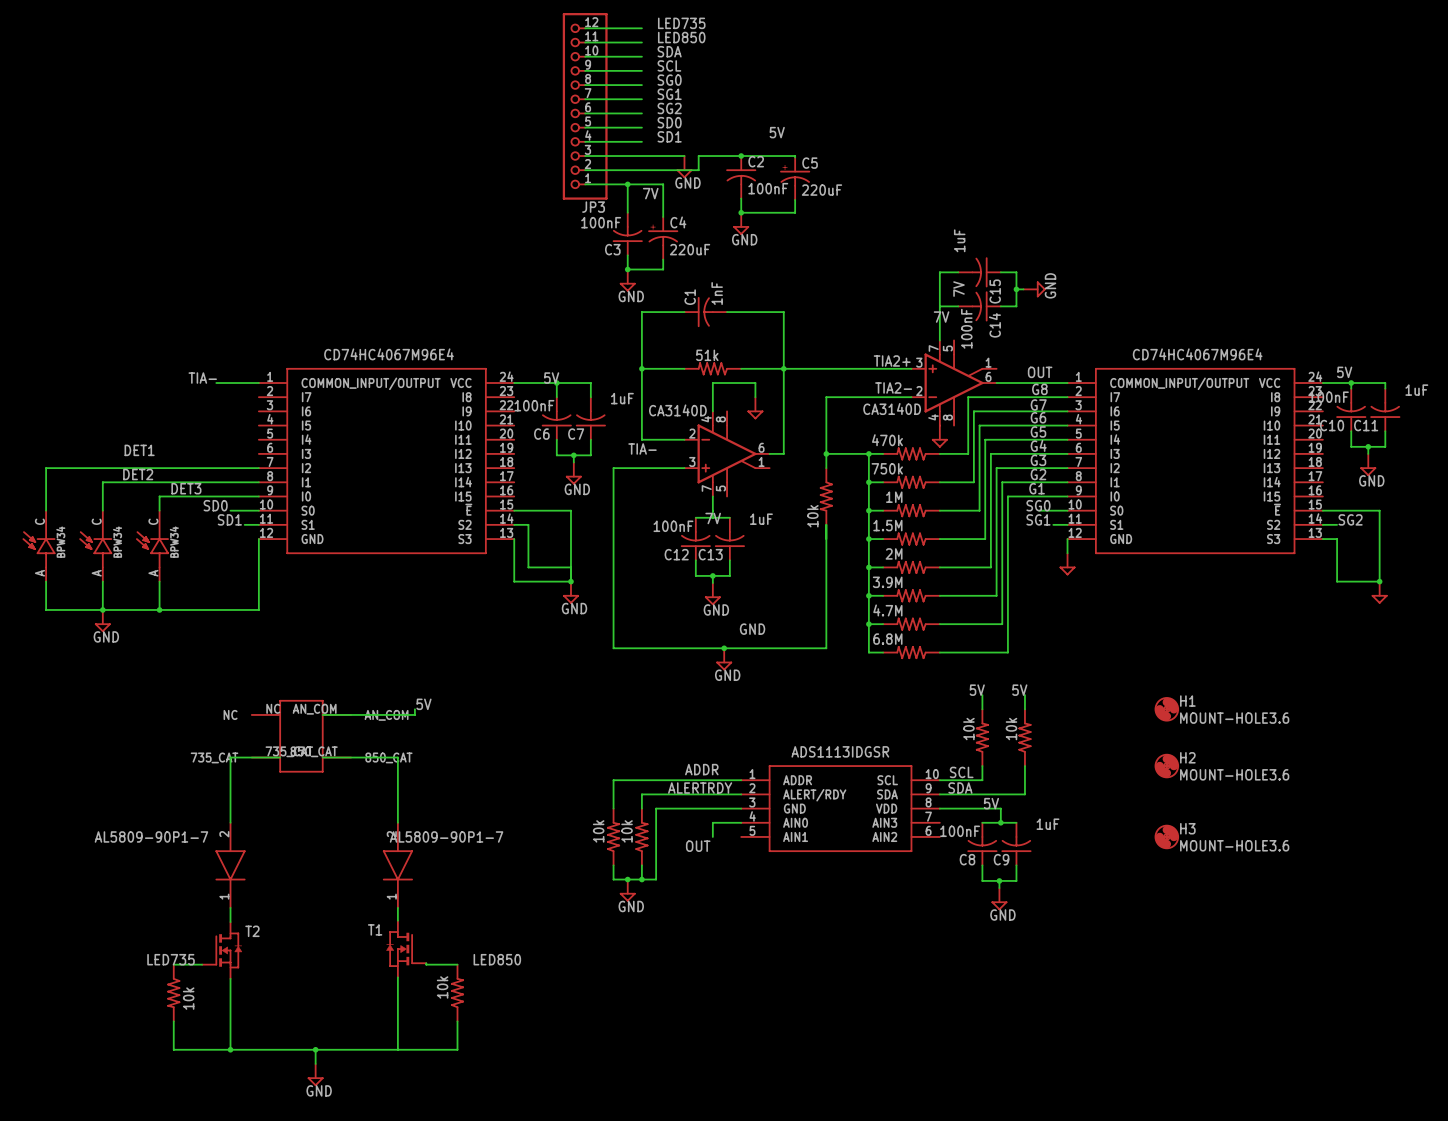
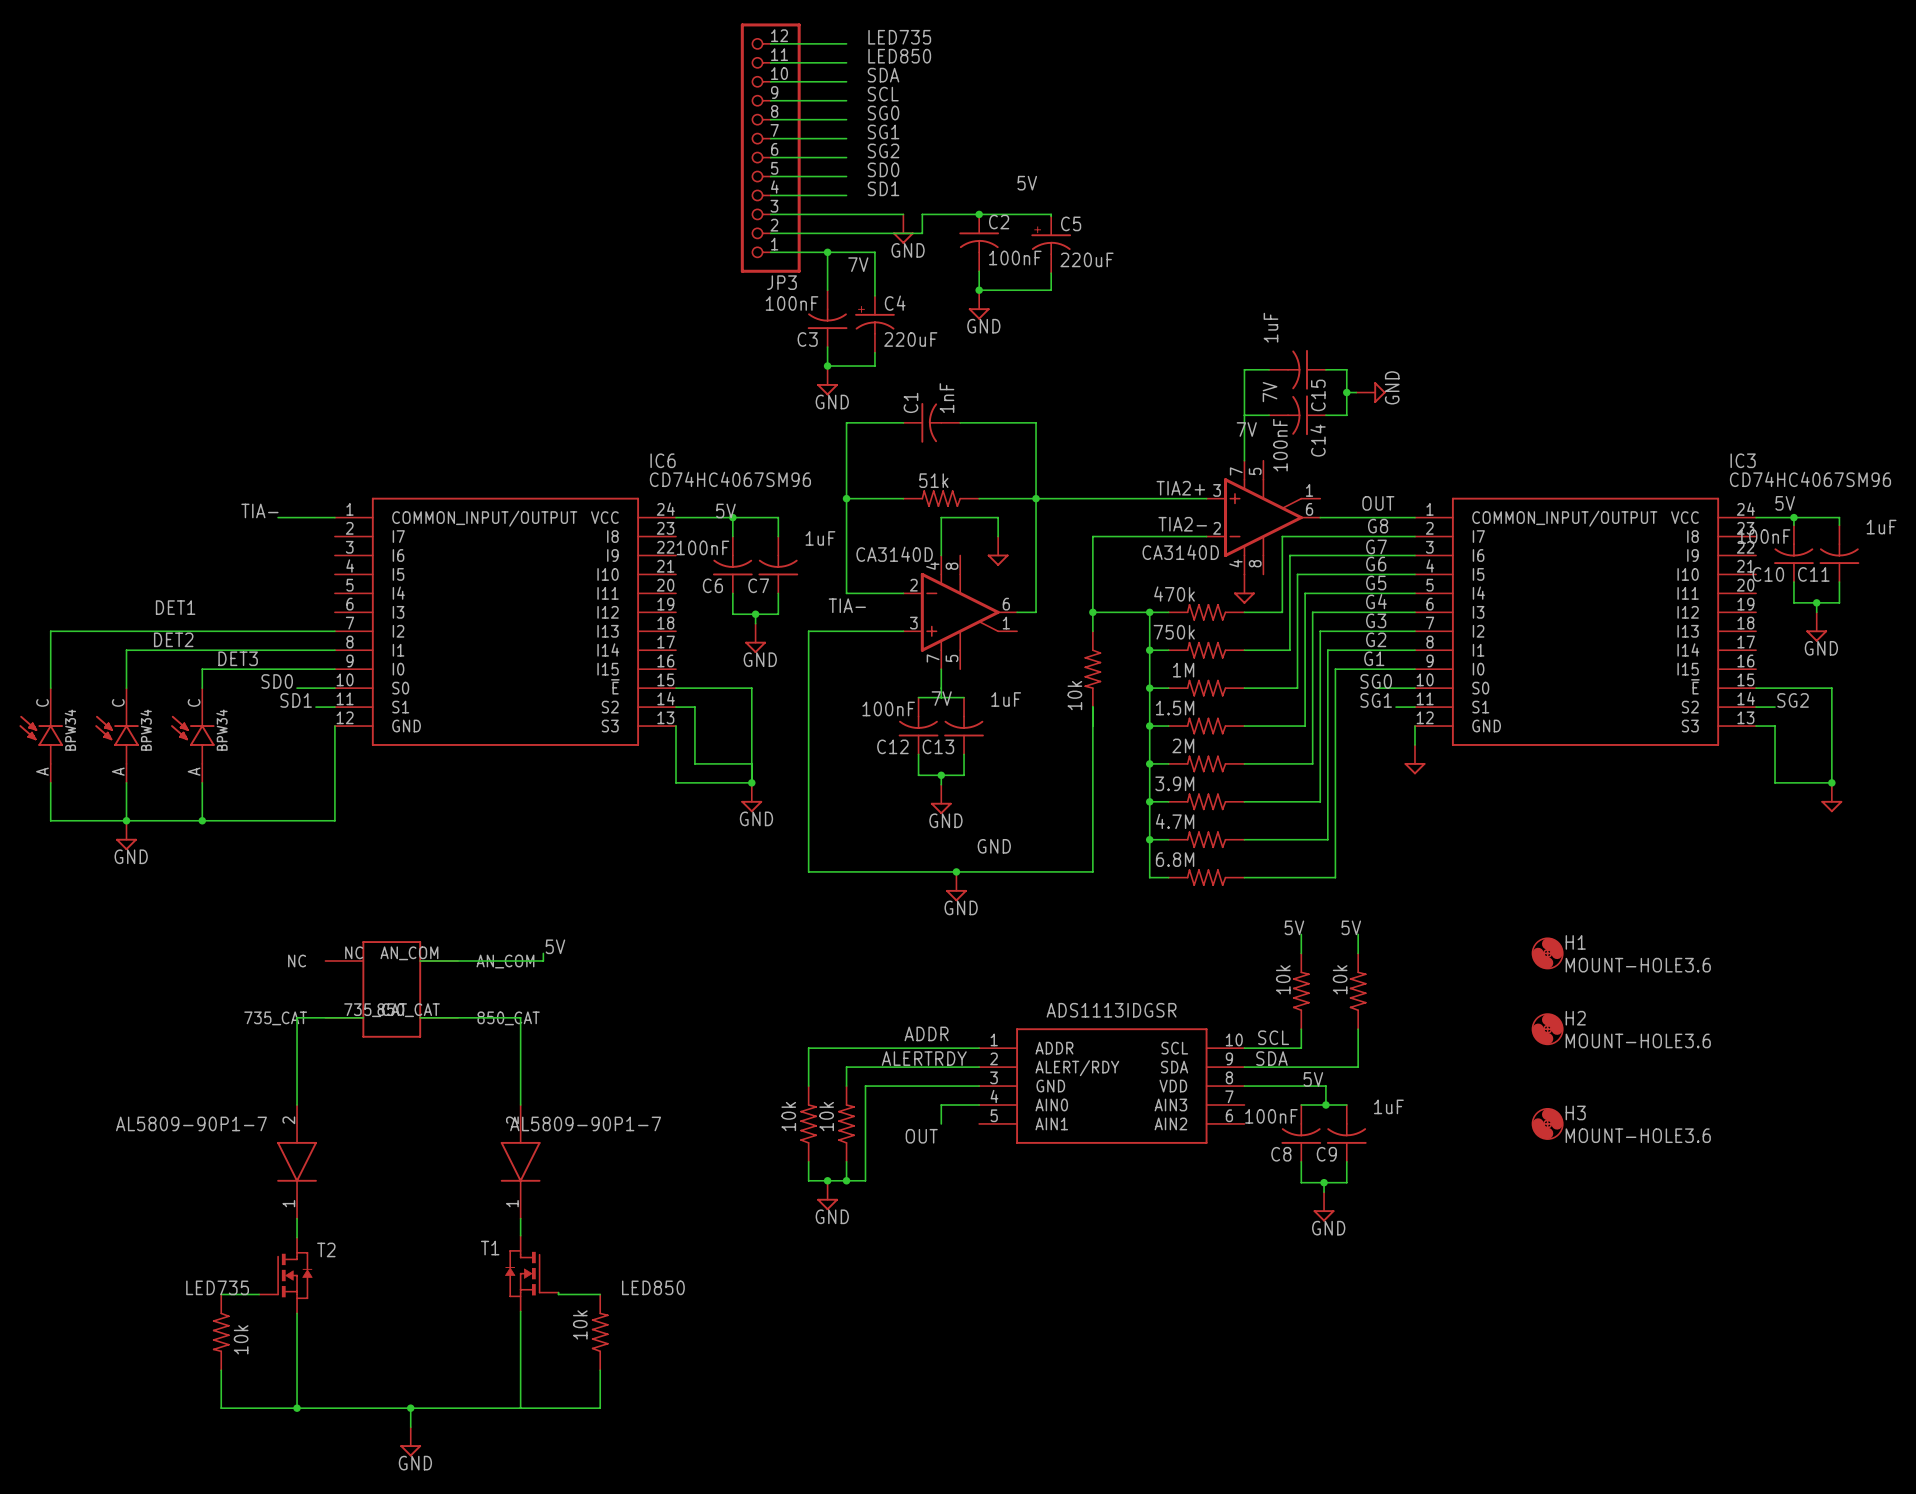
IC6 name: none -> IC6 (663, 460)
IC3 name: none -> IC3 (1743, 460)
IC6 value: CD74HC4067M96E4 (389, 354) -> CD74HC4067SM96 (730, 479)
IC3 value: CD74HC4067M96E4 (1197, 354) -> CD74HC4067SM96 (1810, 479)

